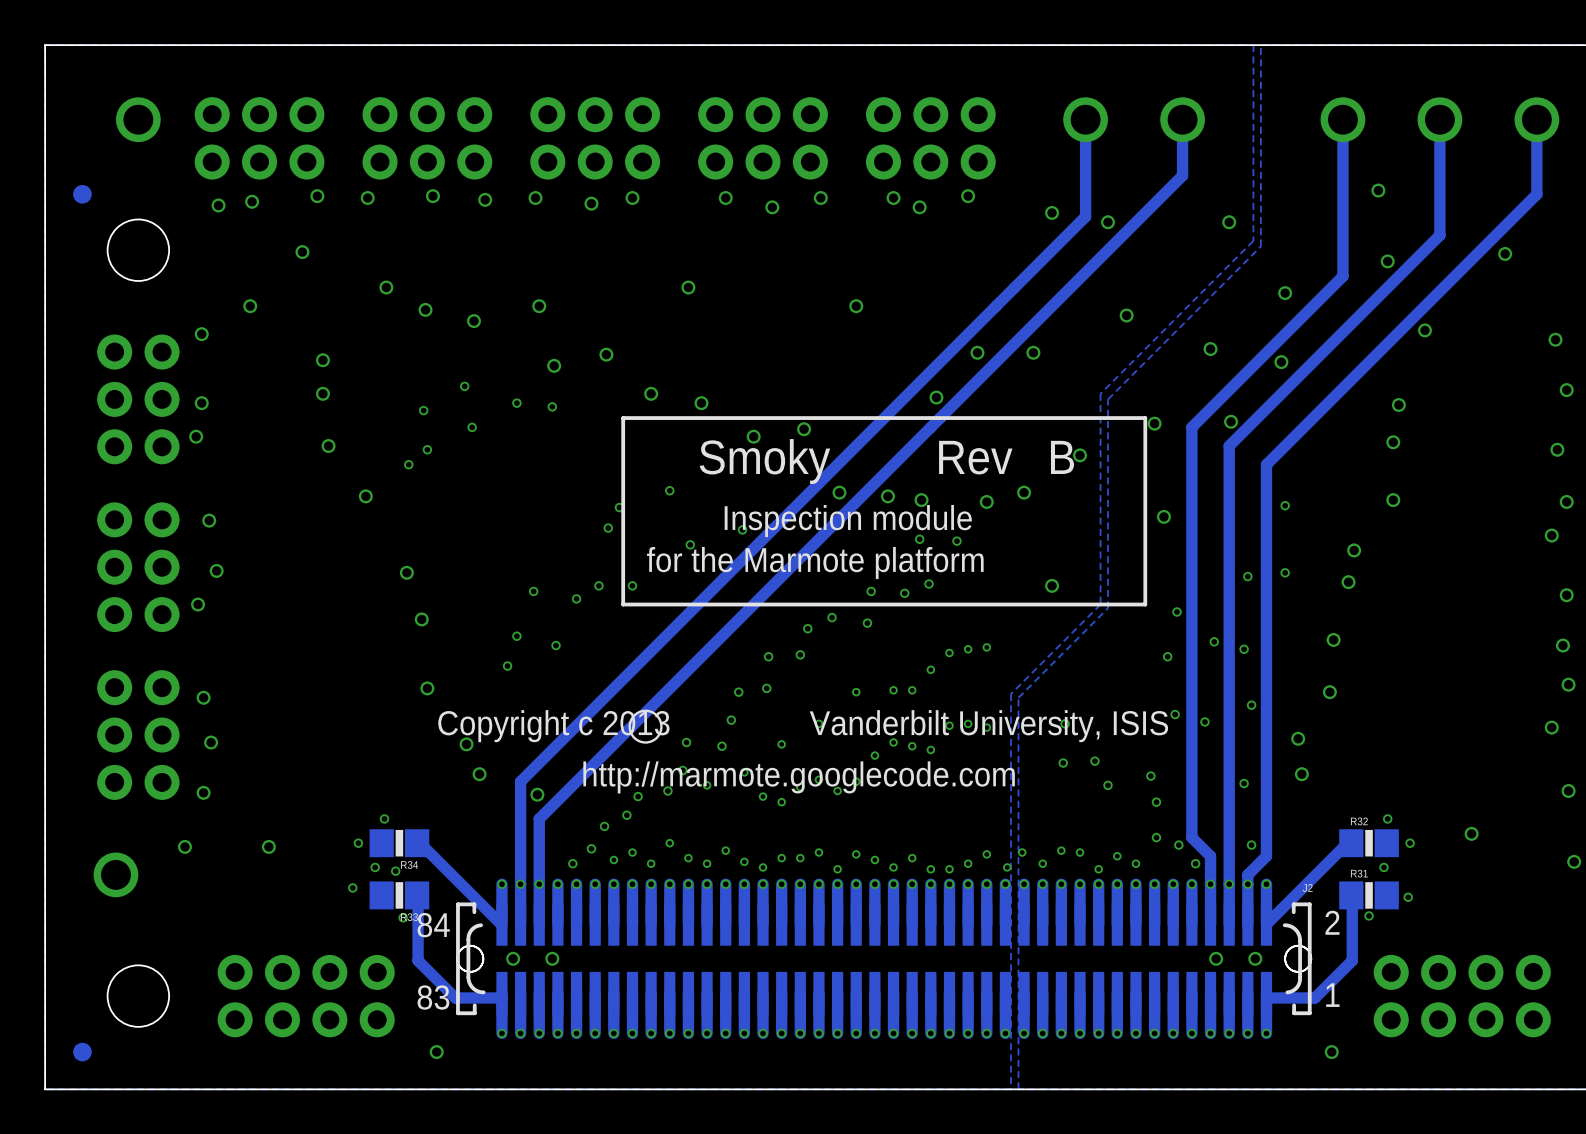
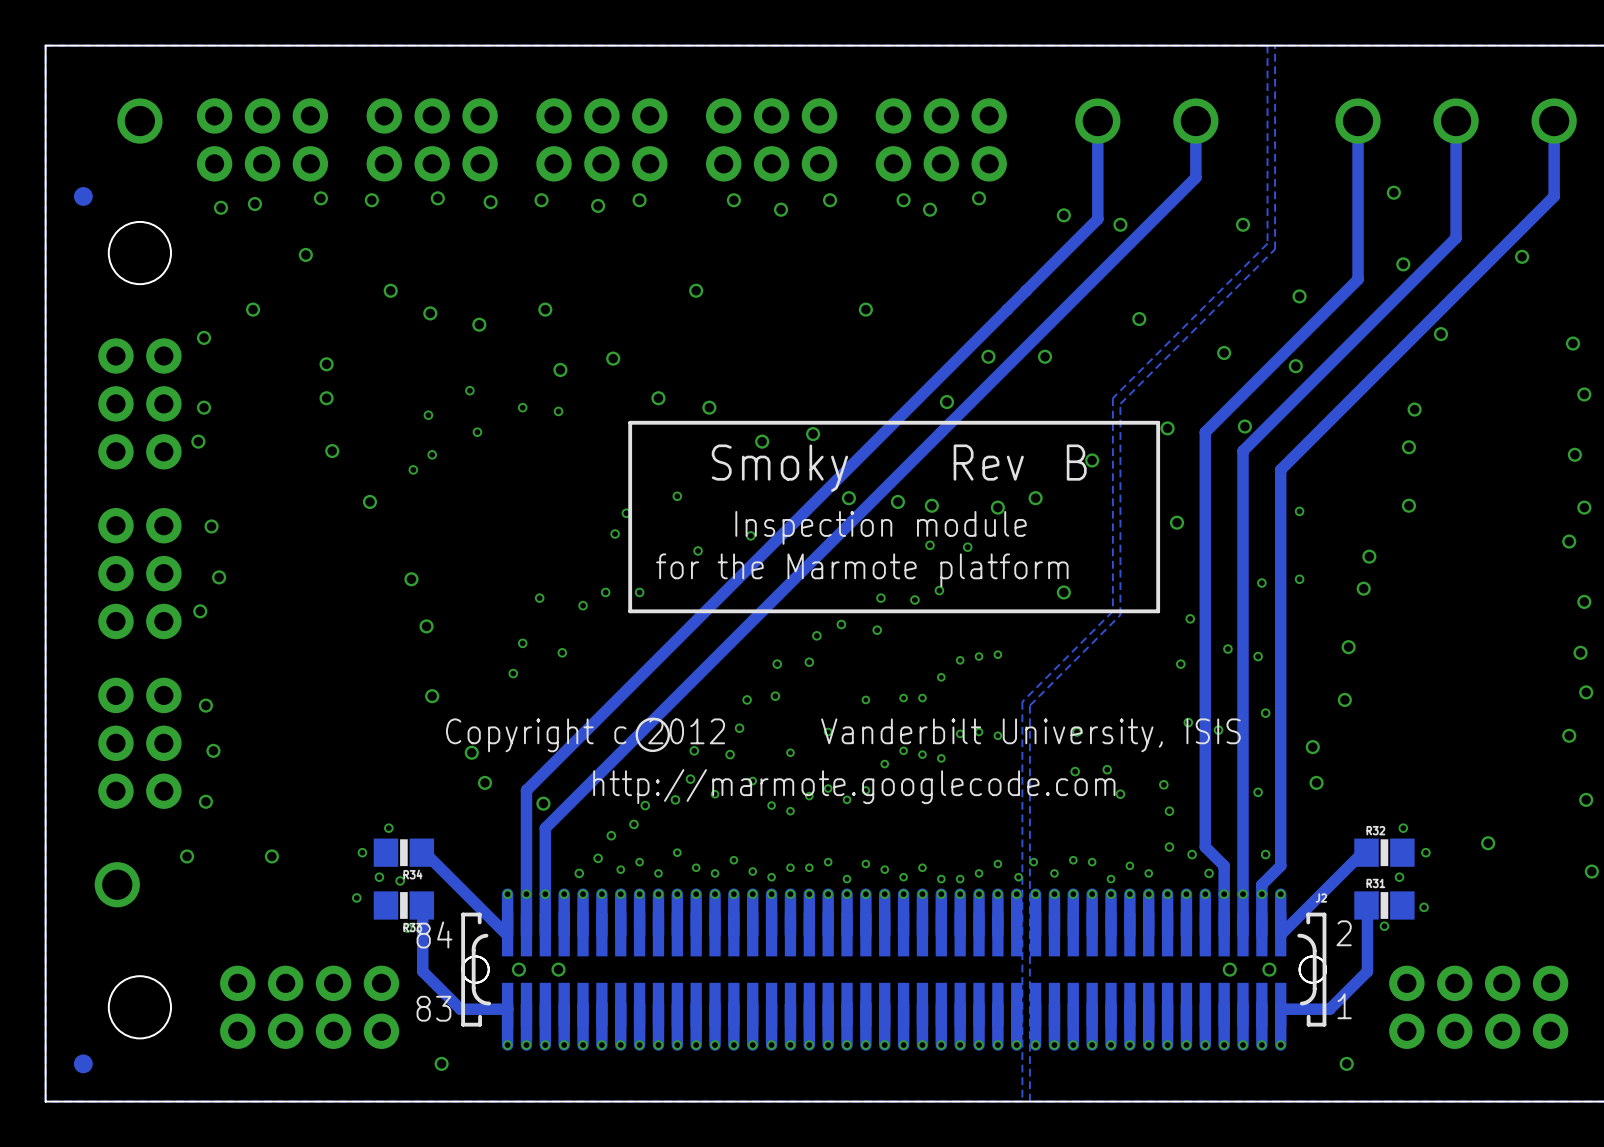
text: Copyright c 2013 (553, 726) -> Copyright c 2012 (585, 735)

